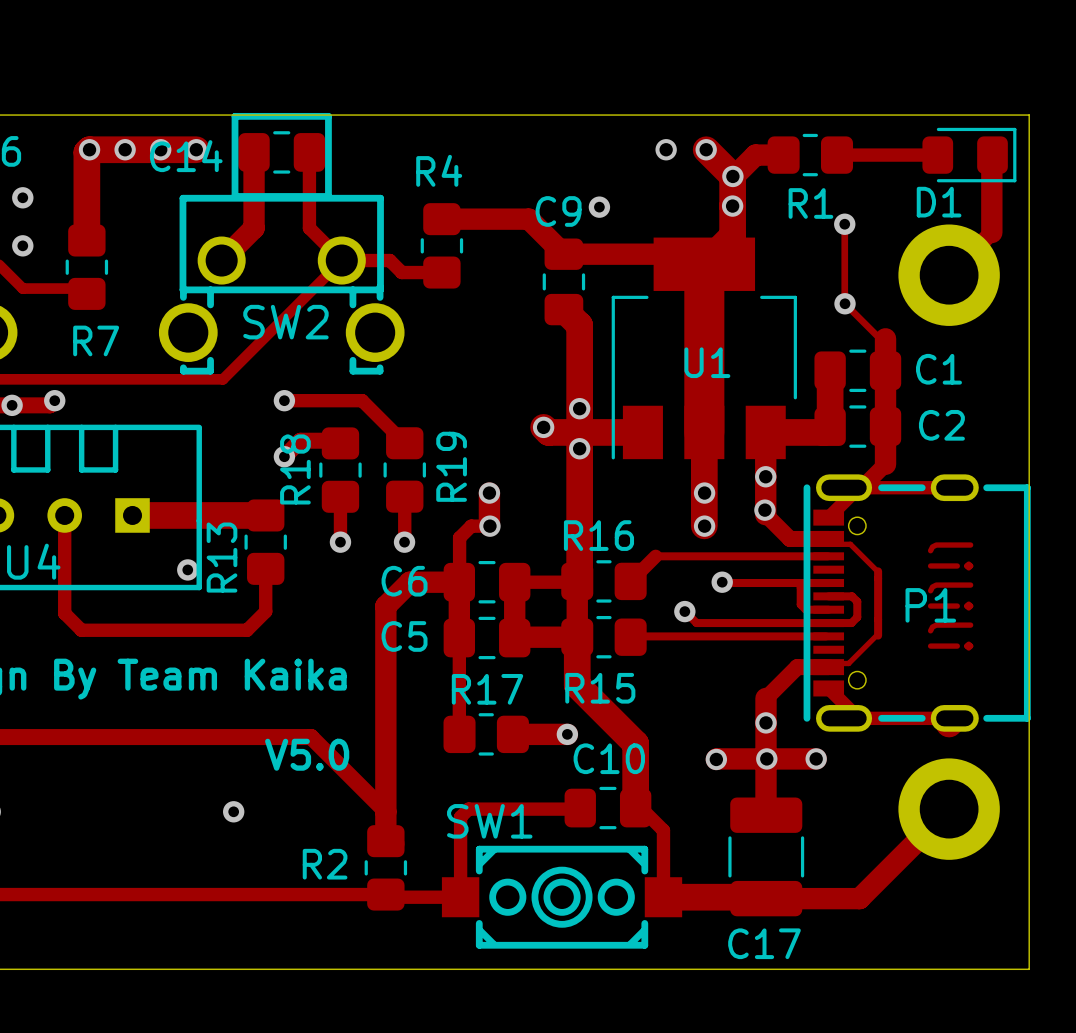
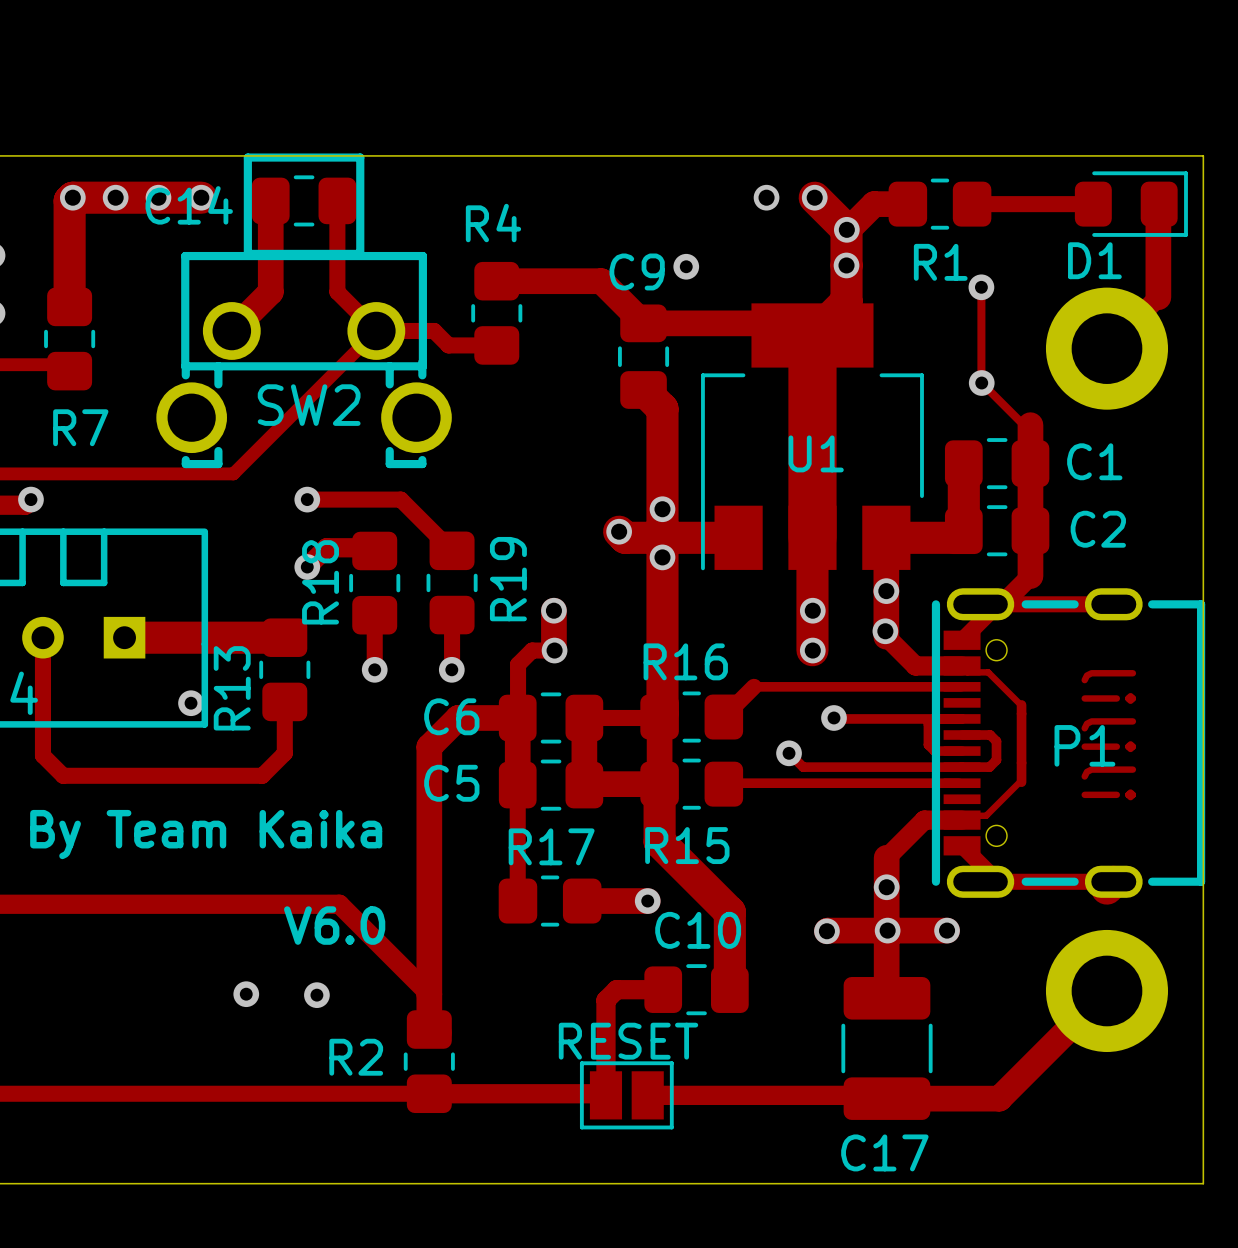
text: V5.0 (307, 754) -> V6.0 (334, 925)
track: none -> (663, 989) (616, 989) (605, 1000) (605, 1095)
track: (582, 809) (468, 809) (460, 817) (460, 897) -> none
track: (642, 809) (663, 830) (663, 897) (768, 897) -> none
via: none -> (316, 995)
track: (460, 883) (447, 897) (393, 897) -> none
track: none -> (429, 1093) (603, 1093) (606, 1096)
RESET: none -> (626, 1095)
track: none -> (647, 1095) (883, 1095) (886, 1098)
SW1: (562, 897) -> none

